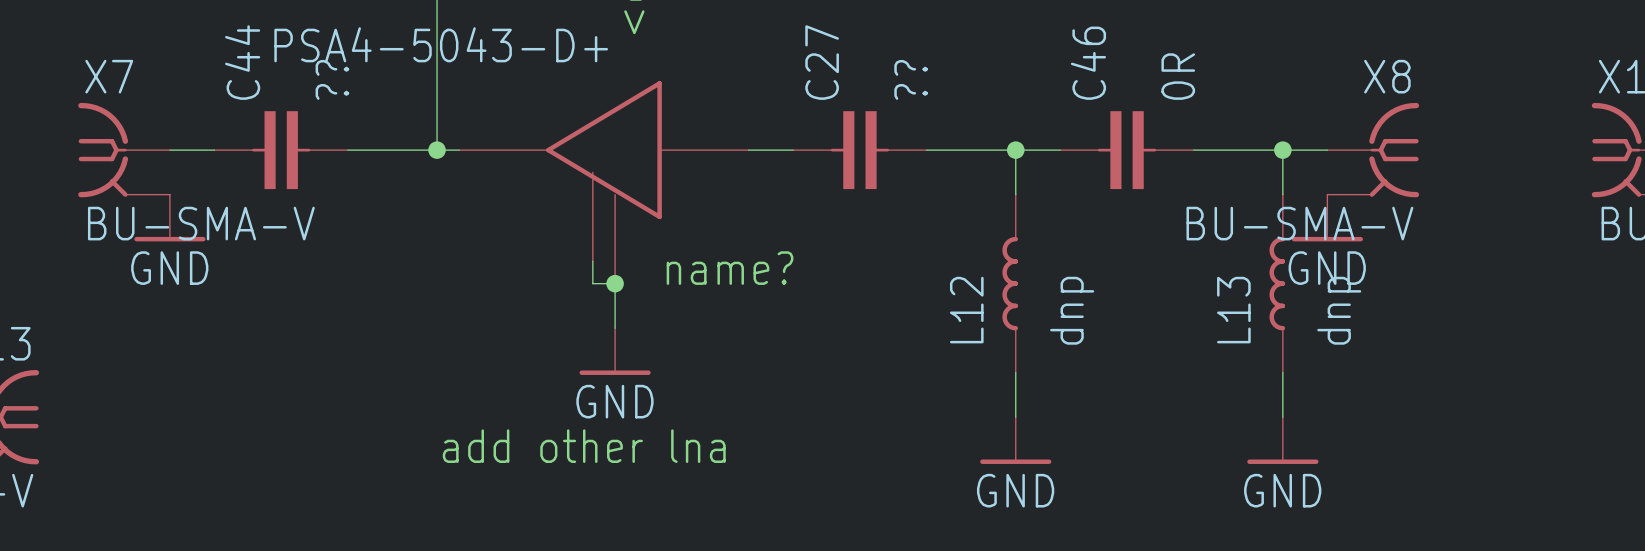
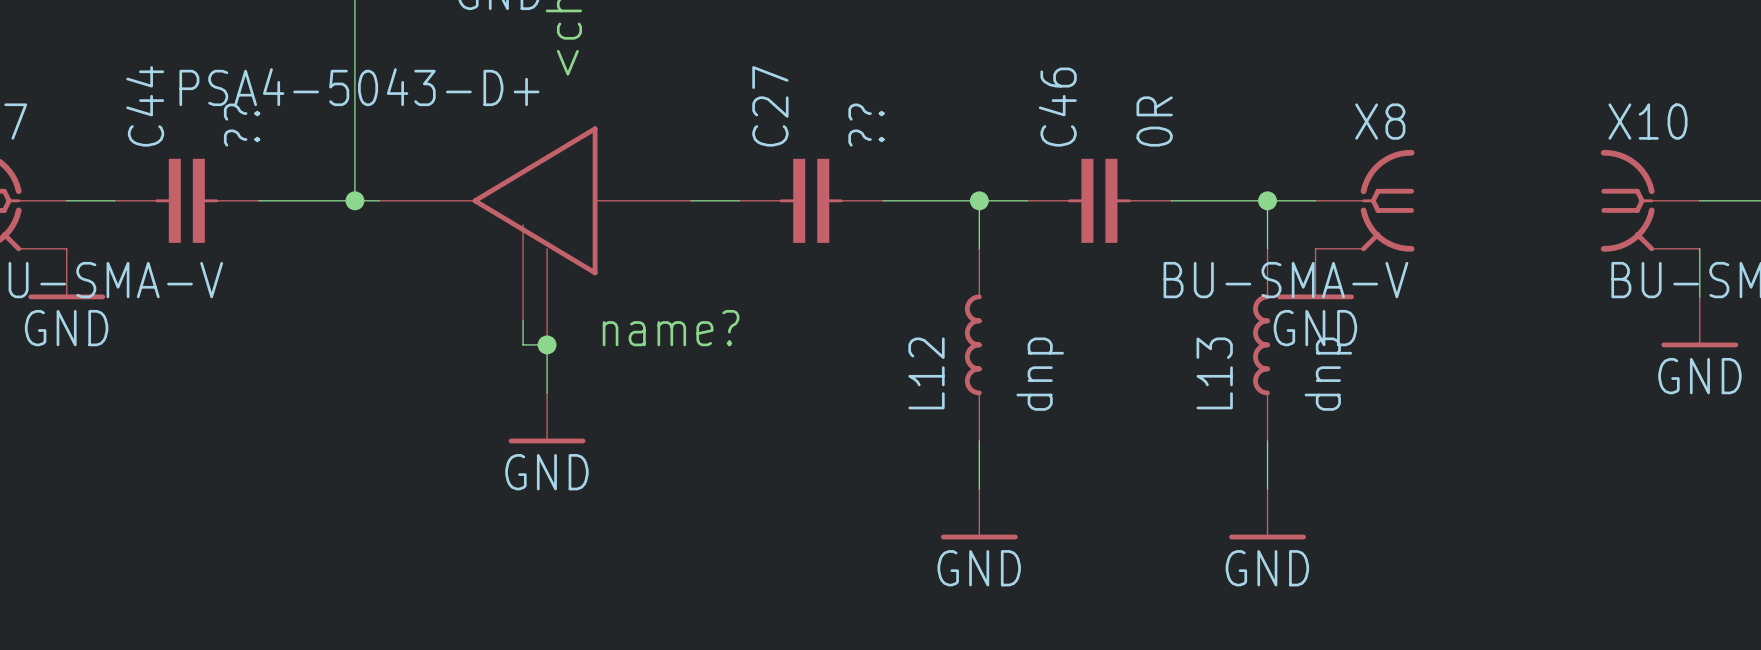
text: add other lna (584, 446) -> none

